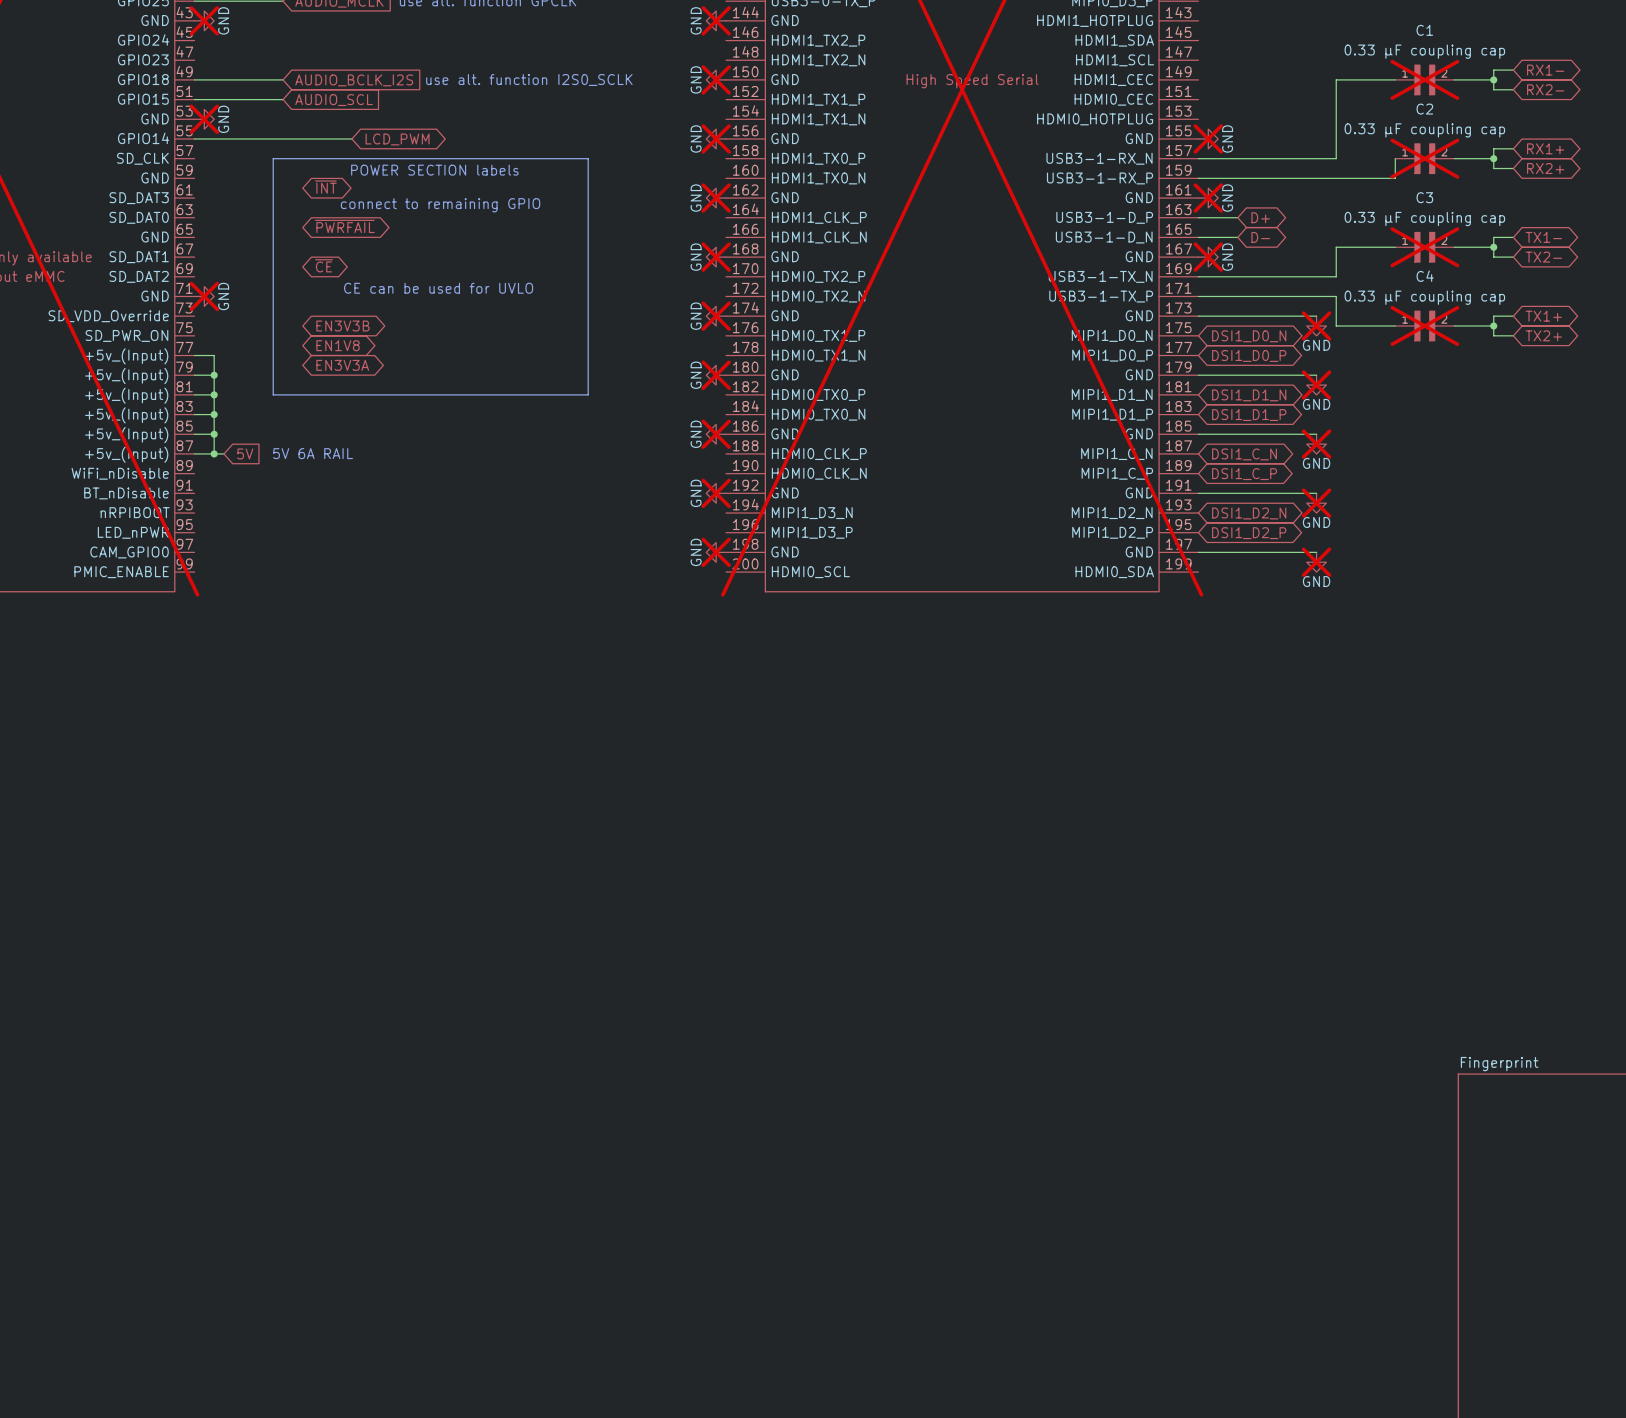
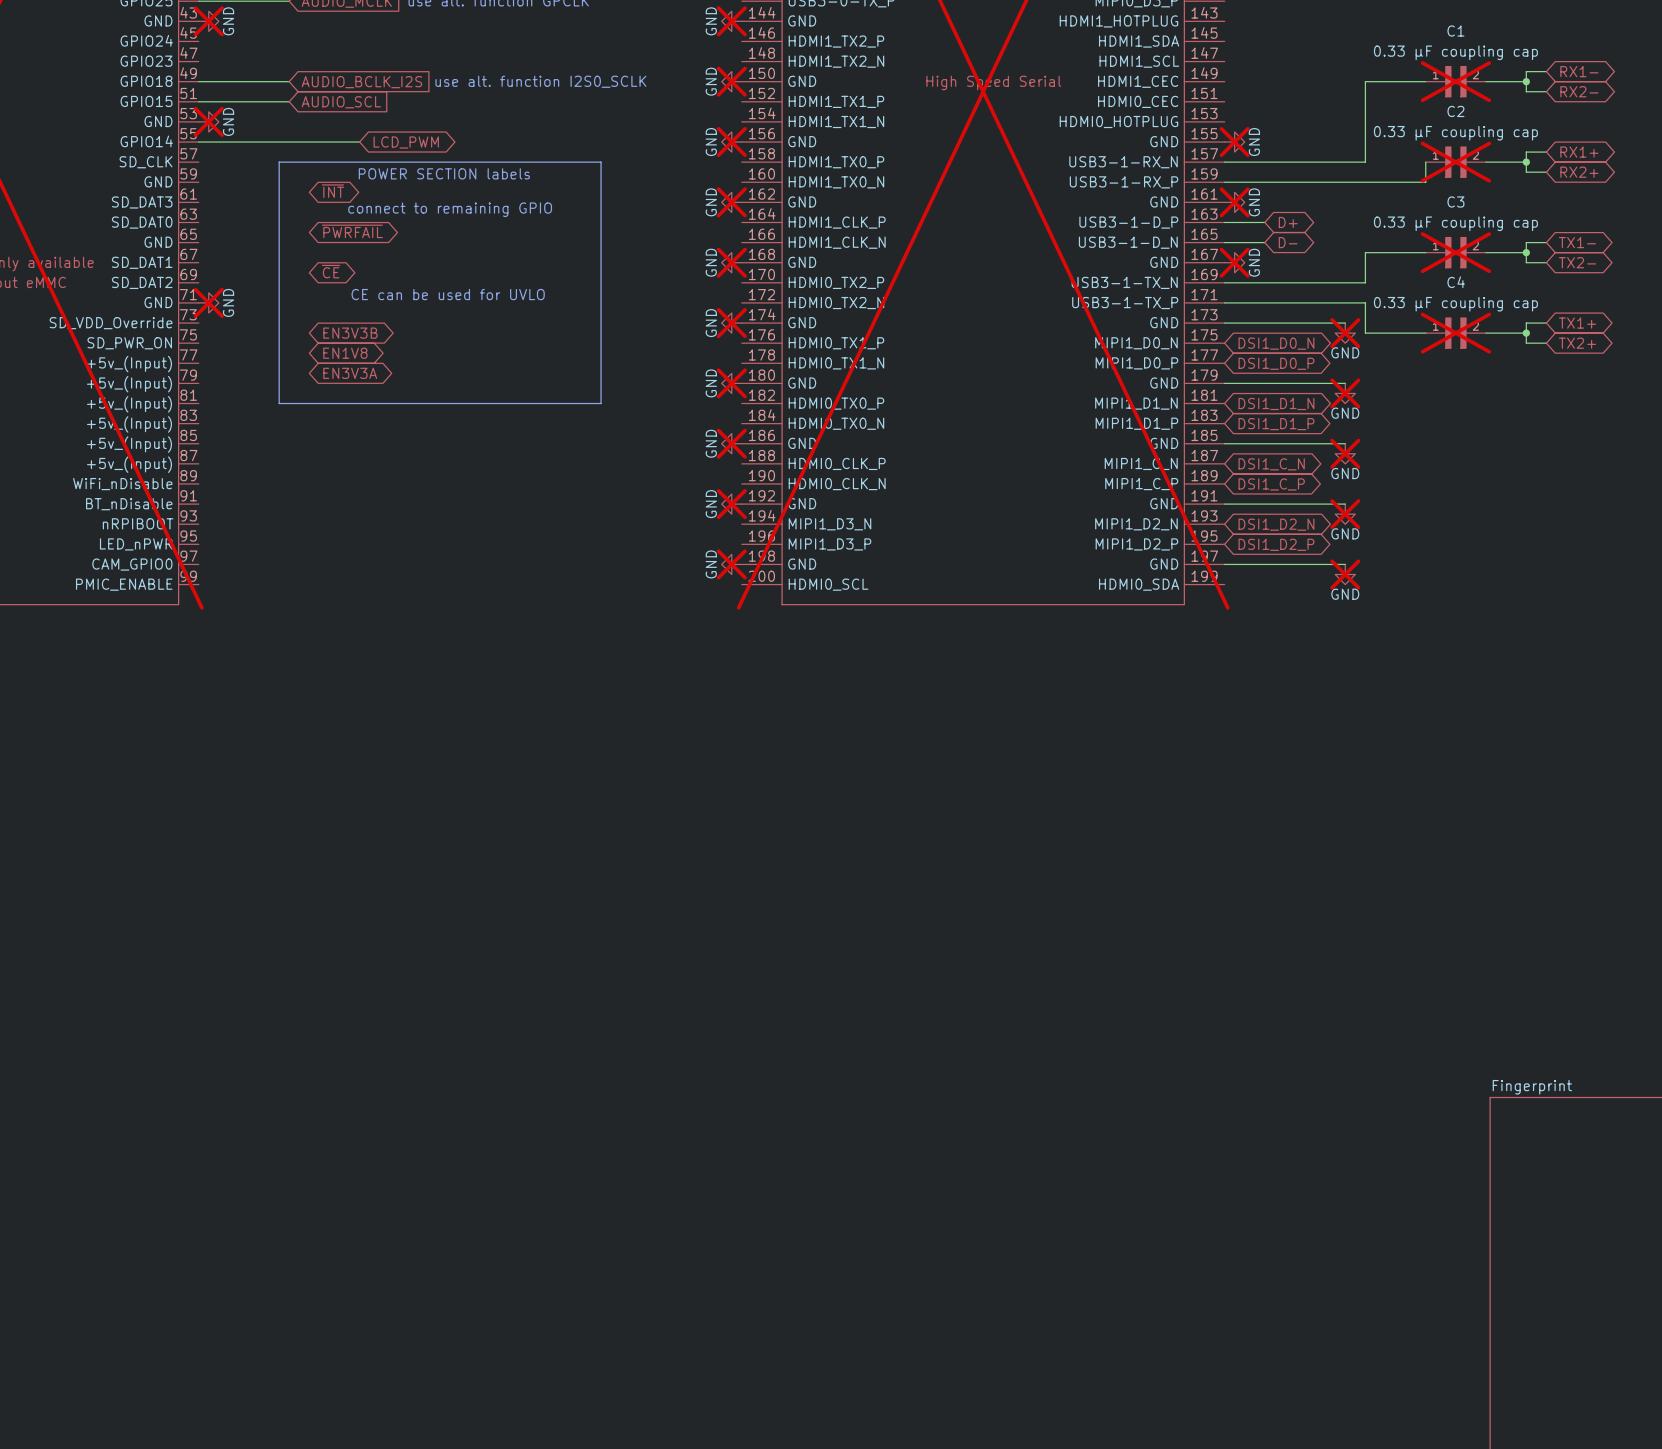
wire: (194, 355) (214, 355) (214, 453) -> none
wire: (194, 375) (214, 375) -> none
junction: (214, 375) -> none
wire: (194, 394) (214, 394) -> none
junction: (214, 394) -> none
wire: (194, 414) (214, 414) -> none
junction: (214, 414) -> none
wire: (194, 434) (214, 434) -> none
junction: (214, 434) -> none
wire: (194, 453) (224, 453) -> none
junction: (214, 453) -> none
global label: 5V (245, 453) -> none
text: 5V 6A RAIL (313, 453) -> none

